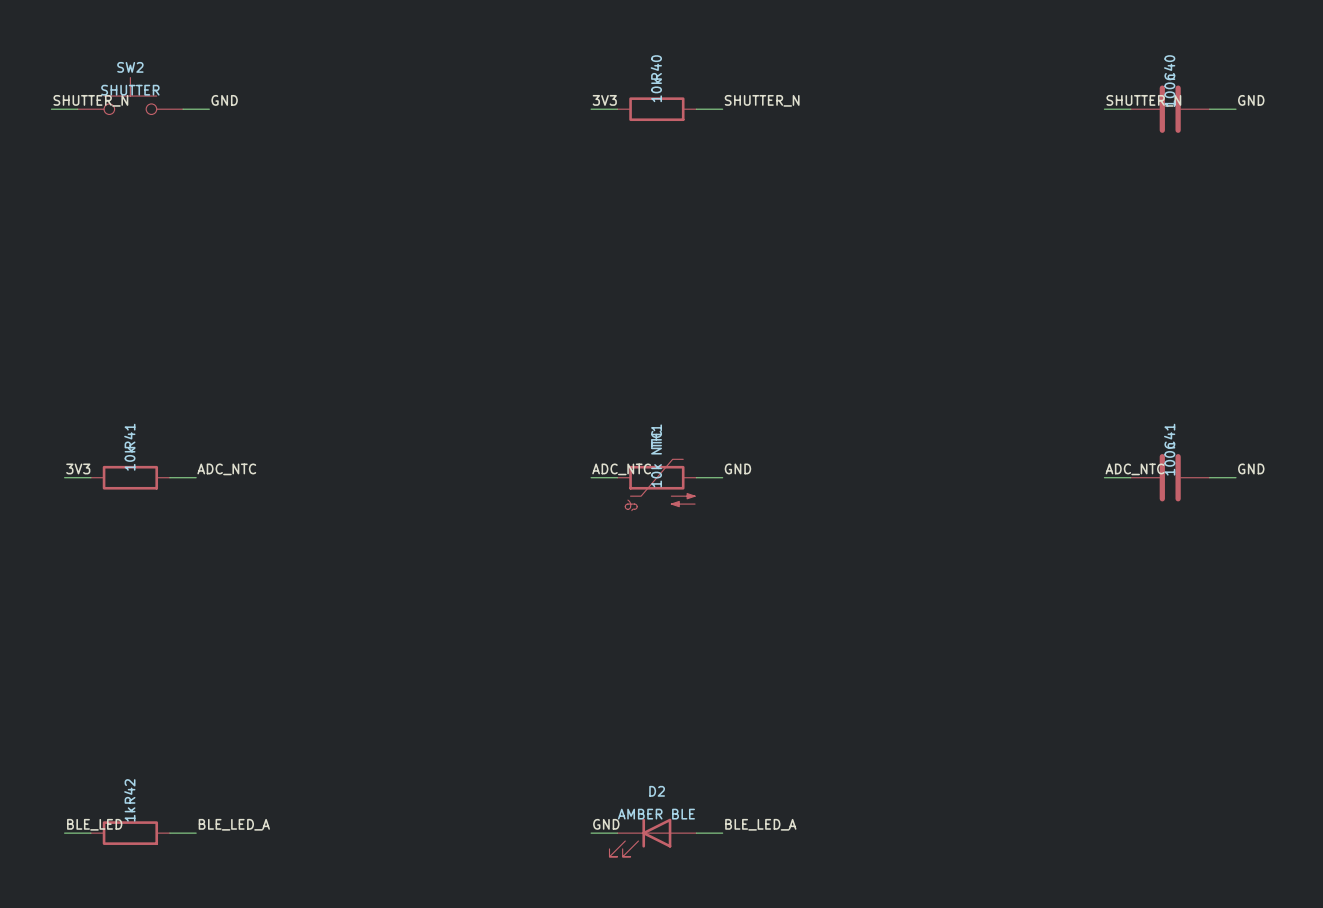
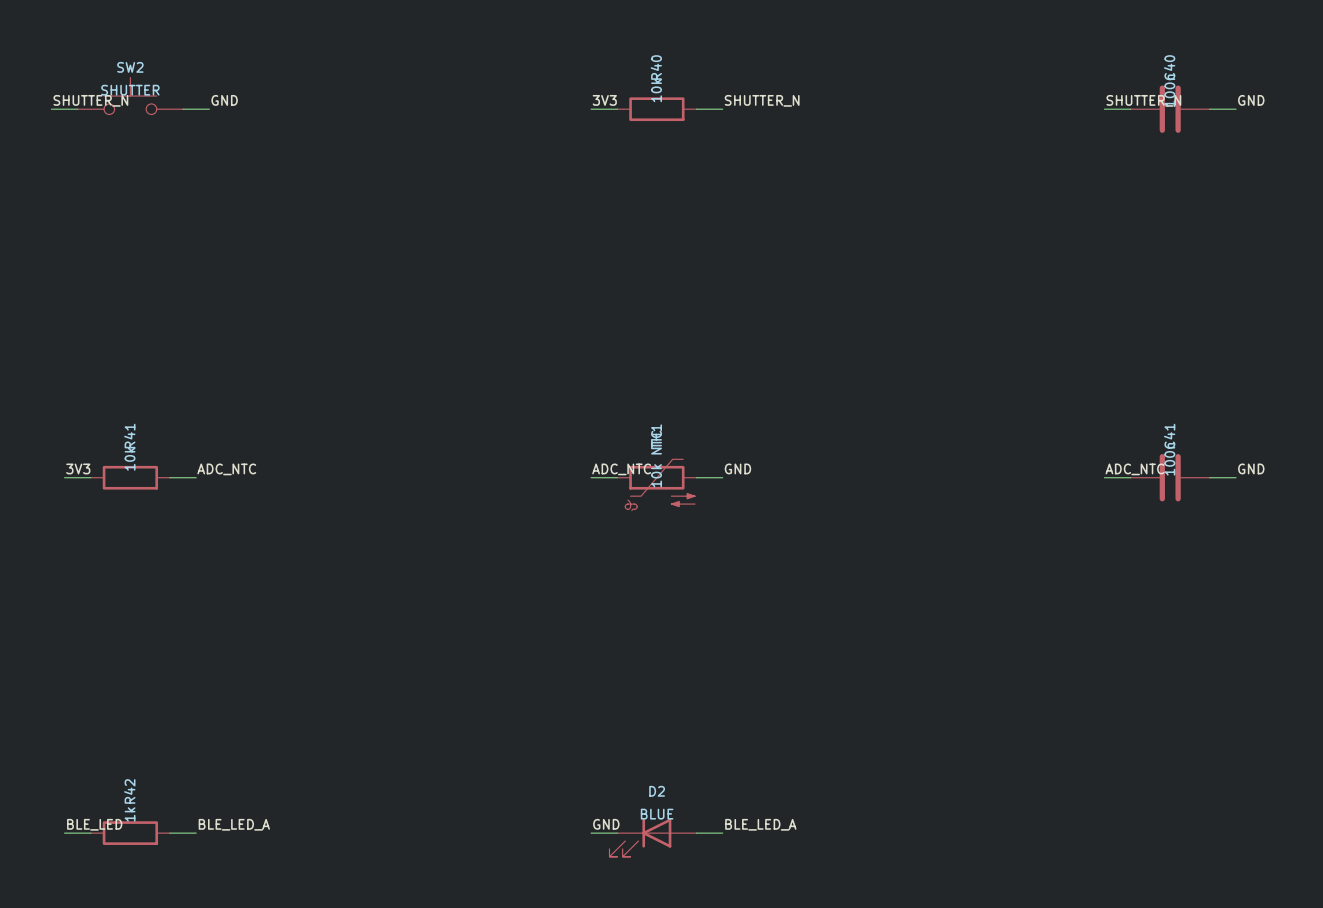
D2 value: AMBER BLE (656, 814) -> BLUE (657, 814)

